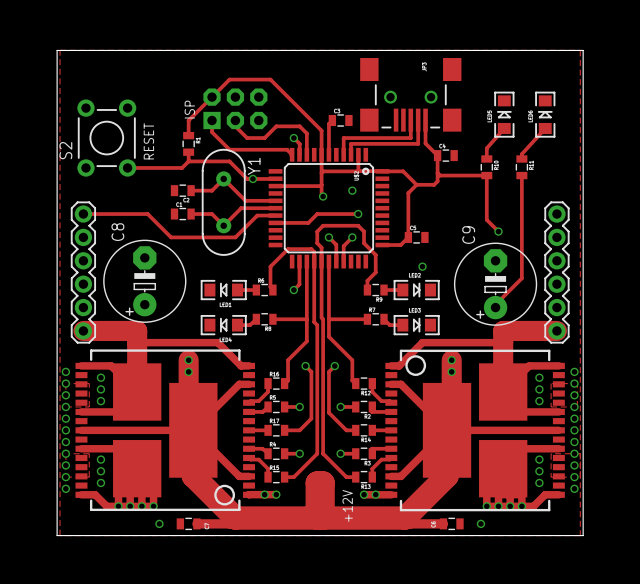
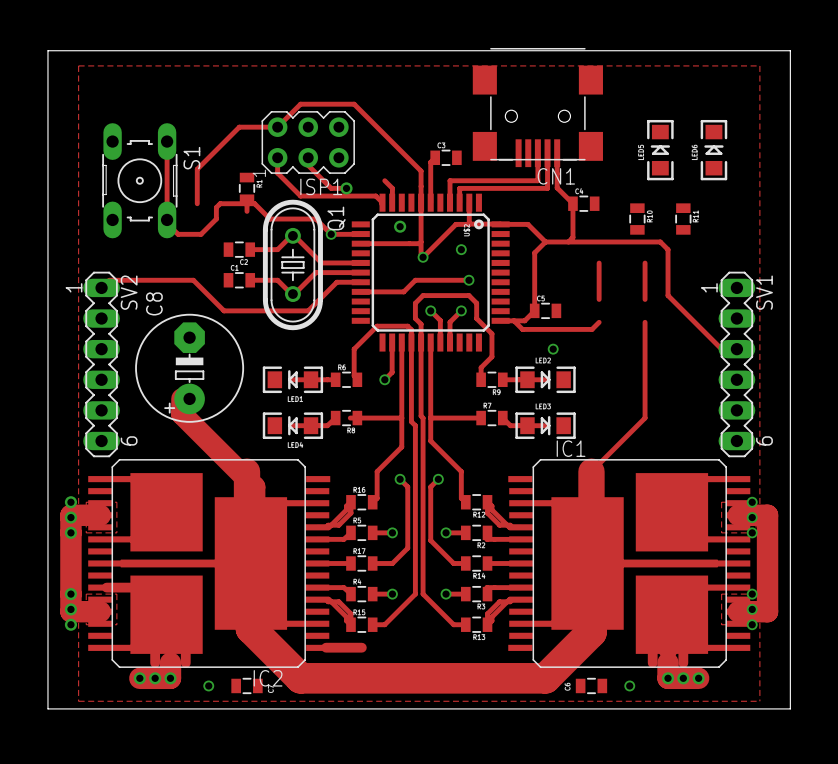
board edge: (57, 50) (583, 50) (583, 535) (57, 535) (57, 50) -> (47, 50) (47, 708) (790, 708) (790, 50) (47, 50)
CN1: none -> (537, 107)
part: (410, 94) -> none
track: (212, 97) (188, 120) (188, 135) -> (277, 127) (239, 127) (197, 169) (197, 203)
part: (235, 108) -> none
ISP1: none -> (308, 142)
text: ISP (189, 109) -> none
track: (504, 128) (486, 148) (486, 158) -> none
track: (545, 128) (521, 154) (521, 158) -> none
S2: (106, 138) -> none
S1: none -> (139, 180)
track: (247, 138) (264, 138) (276, 126) (299, 126) (306, 133) (306, 154) -> (323, 180) (331, 188) (346, 188)
via: (293, 138) -> none
text: RESET (148, 141) -> none
via: none -> (346, 188)
track: (127, 167) (182, 167) (188, 161) (229, 161) (247, 178) (252, 178) -> (167, 141) (167, 223) (178, 234) (201, 234) (216, 219) (216, 207) (220, 203) (254, 203) (269, 219) (315, 219) (331, 234)
track: (348, 171) (323, 171) (321, 173) -> (455, 224) (423, 257)
via: none -> (400, 226)
track: (437, 173) (440, 175) (486, 175) (486, 219) (498, 231) -> none
track: (521, 175) (521, 278) (495, 304) (495, 307) -> none
track: none -> (568, 241) (660, 241) (668, 249) (668, 295) (721, 349) (736, 349)
track: none -> (599, 263) (599, 299)
track: none -> (645, 263) (645, 299)
Y1: (223, 202) -> none
Q1: none -> (292, 264)
via: (498, 231) -> none
track: none -> (513, 320) (522, 329) (592, 329) (599, 322)
track: none -> (645, 322) (645, 418) (583, 479) (583, 559) (591, 567) (591, 632) (545, 678) (530, 678)
part: (83, 272) -> none
part: (556, 272) -> none
SV2: none -> (101, 364)
SV1: none -> (736, 364)
C9: (495, 284) -> none
track: none -> (291, 379) (311, 379)
track: none -> (527, 379) (547, 379)
track: none -> (181, 398) (181, 414) (254, 486) (254, 559) (250, 563) (250, 628) (300, 678) (308, 678)
track: none -> (350, 418) (357, 418)
track: none -> (291, 425) (311, 425)
track: none -> (527, 425) (547, 425)
track: (83, 330) (137, 330) (137, 392) -> none
track: (556, 330) (503, 330) (503, 392) -> none
track: (137, 342) (217, 342) (241, 365) (249, 365) -> none
track: (503, 342) (422, 342) (399, 365) (391, 365) -> none
via: (188, 360) -> none
via: (451, 360) -> none
track: (81, 365) (111, 365) (137, 392) -> none
track: (558, 365) (529, 365) (503, 392) -> none
via: (65, 371) -> none
via: (188, 371) -> none
via: (451, 371) -> none
via: (574, 371) -> none
via: (100, 377) -> none
via: (539, 377) -> none
via: none -> (70, 502)
via: (65, 383) -> none
track: none -> (350, 502) (346, 506) (346, 509) (329, 527) (317, 527)
track: none -> (488, 502) (491, 506) (491, 509) (509, 527) (521, 527)
track: (249, 384) (239, 384) (193, 430) -> none
track: (391, 384) (400, 384) (447, 430) -> none
via: (100, 389) -> none
via: (539, 389) -> none
track: (137, 392) (117, 411) (81, 411) -> none
track: (503, 392) (523, 411) (558, 411) -> none
track: none -> (100, 515) (70, 515) (70, 611) (100, 611)
track: none -> (738, 515) (767, 515) (767, 611) (738, 611)
via: none -> (70, 517)
via: (65, 395) -> none
via: (100, 401) -> none
via: (539, 401) -> none
via: none -> (70, 532)
via: (65, 406) -> none
via: (65, 418) -> none
via: (574, 418) -> none
via: (65, 430) -> none
track: (81, 430) (193, 430) -> none
IC2: none -> (209, 563)
part: (165, 430) -> none
track: (193, 430) (193, 475) (235, 518) (229, 523) (196, 523) -> none
track: (193, 430) (239, 476) (249, 476) -> none
track: (447, 430) (447, 475) (404, 518) (410, 523) (443, 523) -> none
track: (447, 430) (558, 430) -> none
track: (447, 430) (400, 476) (391, 476) -> none
part: (475, 430) -> none
IC1: none -> (629, 563)
via: (574, 430) -> none
via: (65, 442) -> none
via: (574, 442) -> none
track: (558, 448) (523, 448) (486, 485) (486, 506) (533, 506) (545, 494) (558, 494) -> none
via: none -> (70, 594)
via: (65, 453) -> none
track: none -> (317, 599) (329, 599) (346, 617) (346, 620) (350, 624)
track: none -> (521, 599) (509, 599) (491, 617) (491, 620) (488, 624)
via: (100, 459) -> none
via: (539, 459) -> none
via: none -> (70, 609)
via: (65, 465) -> none
via: (100, 471) -> none
via: (539, 471) -> none
via: none -> (70, 624)
via: (65, 477) -> none
via: (100, 482) -> none
track: (147, 482) (153, 482) (153, 506) (106, 506) (95, 494) (81, 494) -> none
via: (539, 482) -> none
via: (65, 488) -> none
via: (574, 488) -> none
via: (264, 494) -> none
via: (276, 494) -> none
track: (364, 494) (391, 494) -> none
via: (364, 494) -> none
via: (375, 494) -> none
text: +12V (347, 505) -> none
via: (118, 506) -> none
track: none -> (170, 663) (170, 678) (139, 678)
via: (130, 506) -> none
via: (141, 506) -> none
via: (153, 506) -> none
via: (486, 506) -> none
via: (498, 506) -> none
track: none -> (668, 663) (668, 678) (698, 678)
via: (510, 506) -> none
via: (521, 506) -> none
via: none -> (139, 678)
via: none -> (155, 678)
via: none -> (170, 678)
track: (317, 518) (317, 482) (323, 482) (323, 518) -> none
via: none -> (668, 678)
via: none -> (683, 678)
via: none -> (698, 678)

